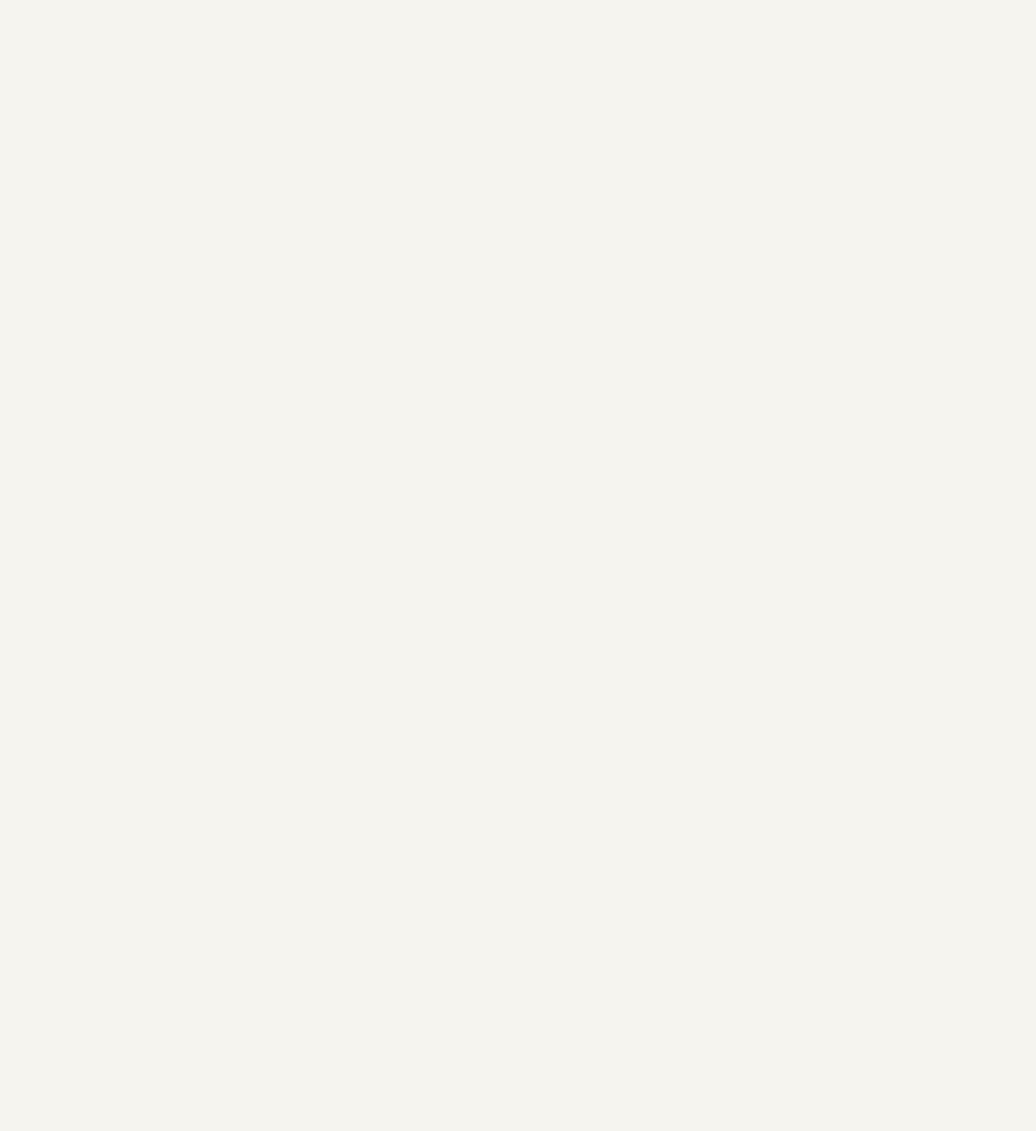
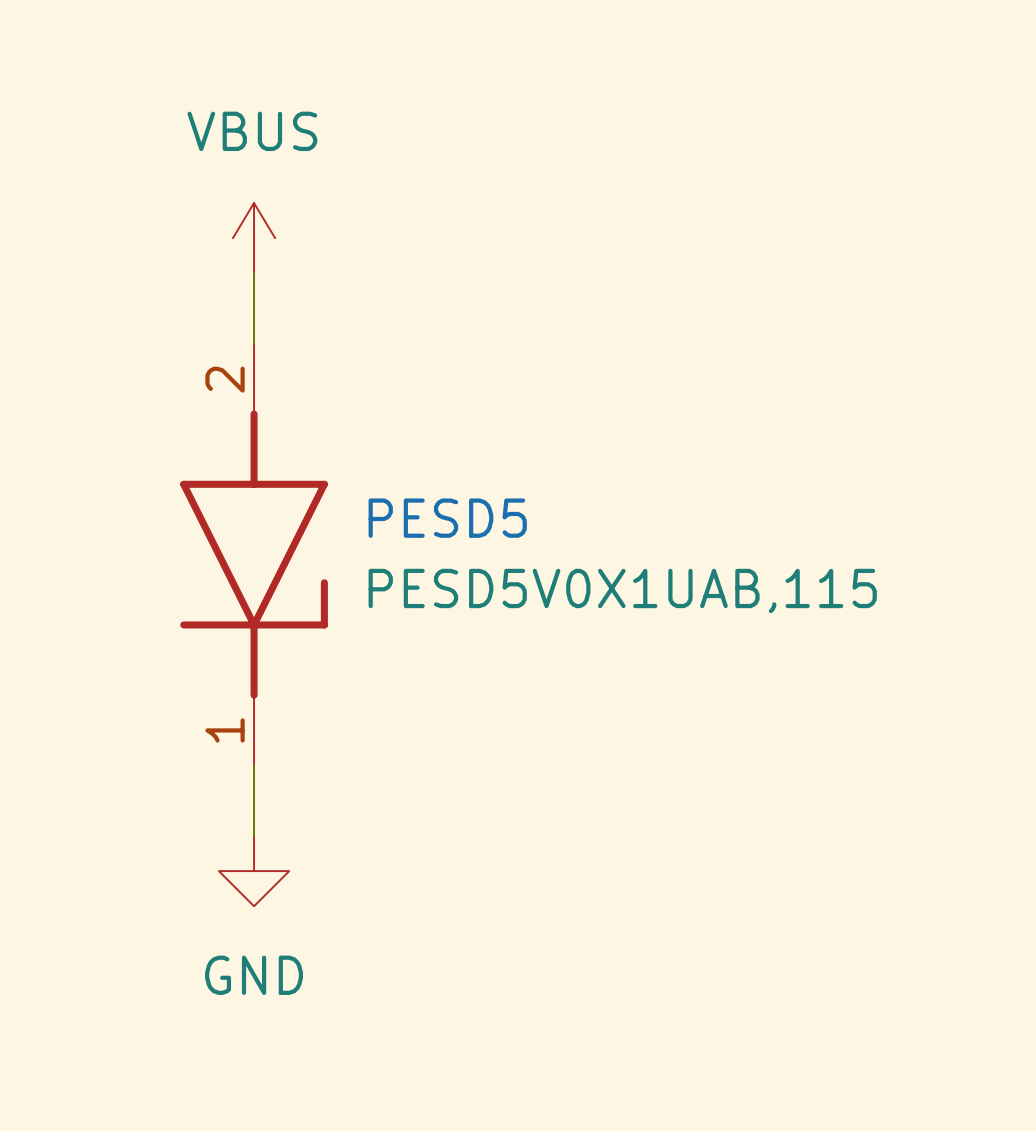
power symbol: none -> VBUS (254, 238)
wire: none -> (254, 273) (254, 343)
PESD5: none -> PESD5V0X1UAB,115 (254, 554)
wire: none -> (254, 765) (254, 835)
power symbol: none -> GND (254, 871)

